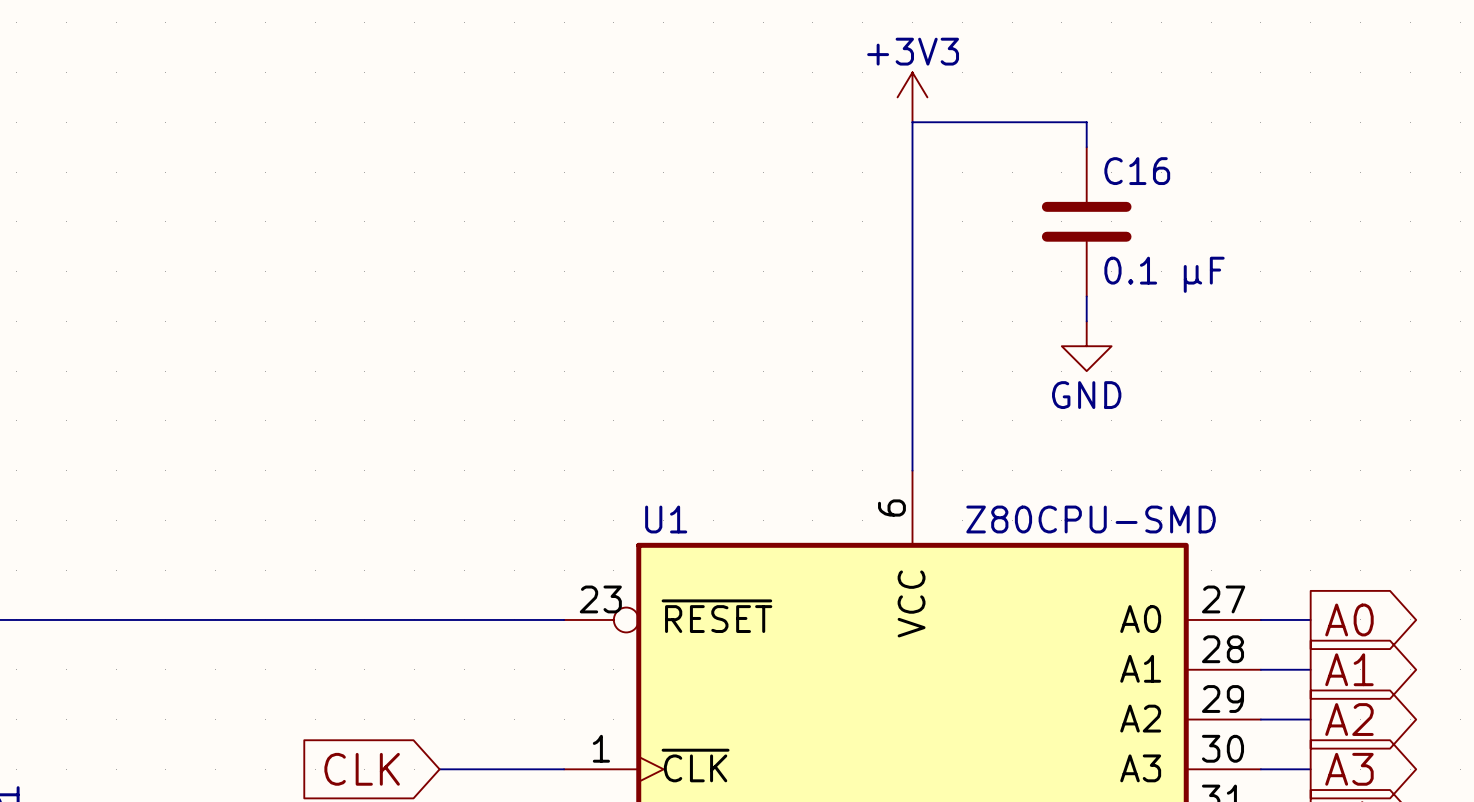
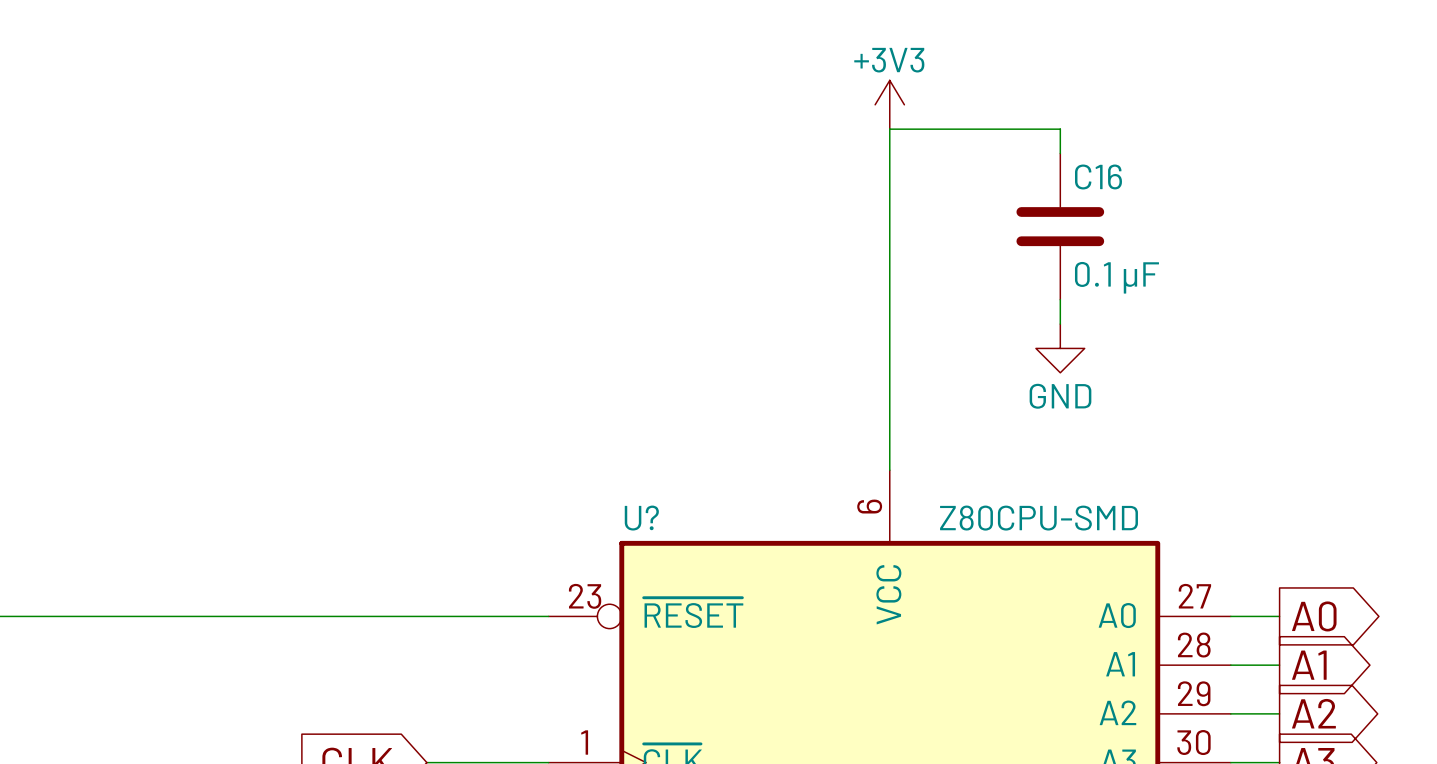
U1 name: U1 (666, 519) -> U? (641, 518)

